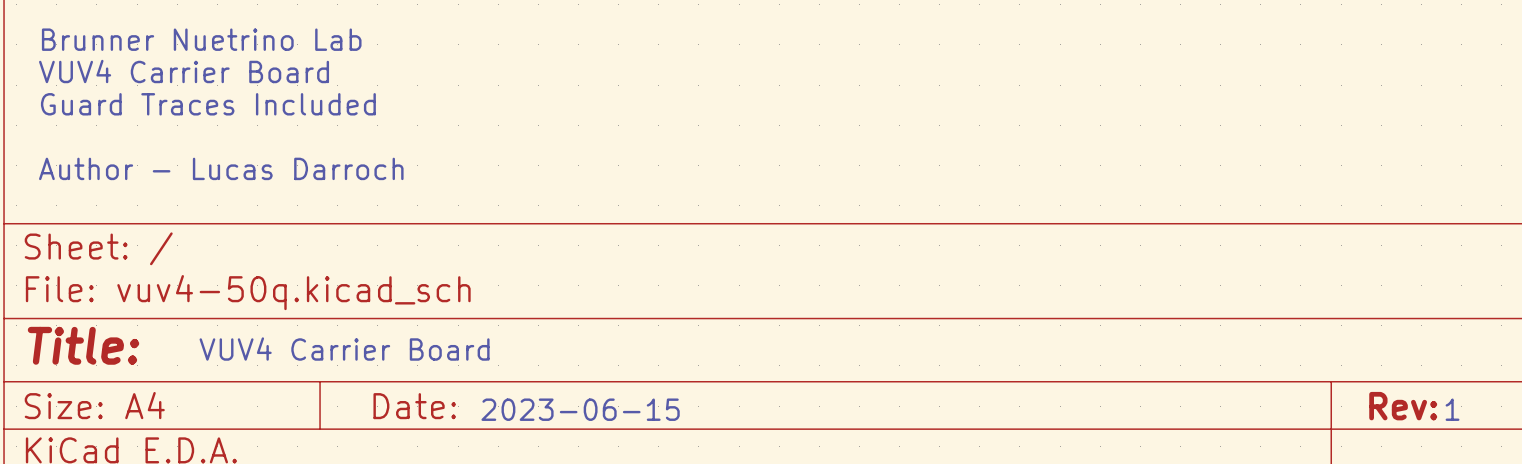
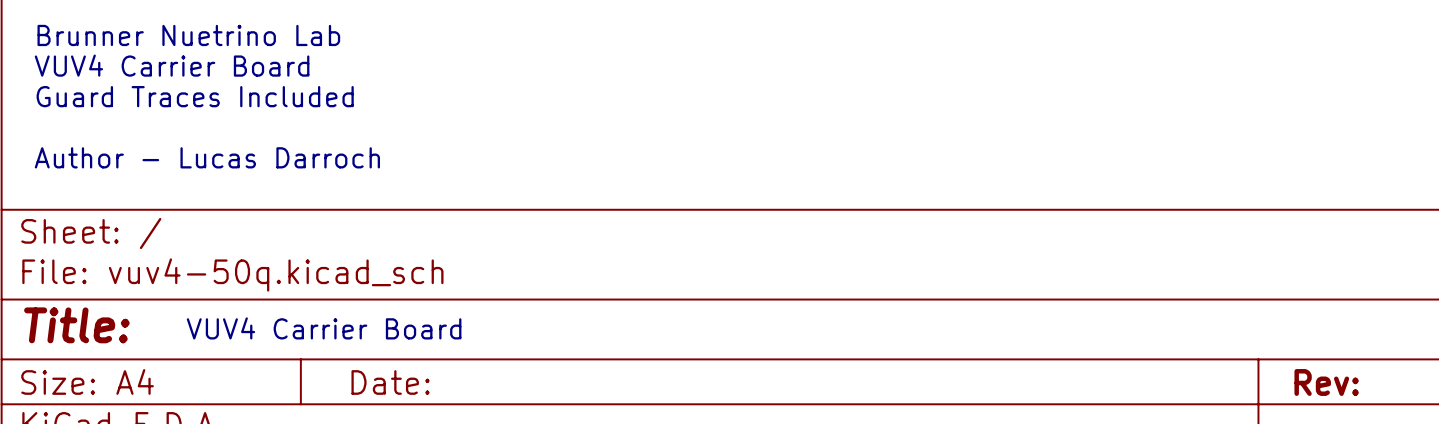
text: 2023-06-15 (580, 409) -> none
text: 1 (1452, 409) -> none

